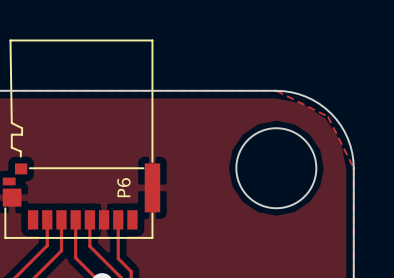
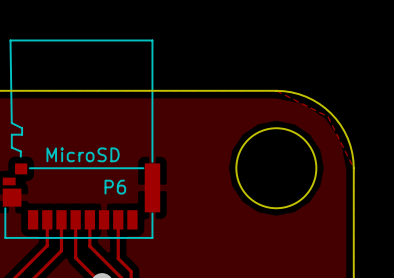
P6 value: none -> MicroSD (83, 154)
P6 name rotation: 0° (123, 187) -> 90° clockwise (115, 187)

